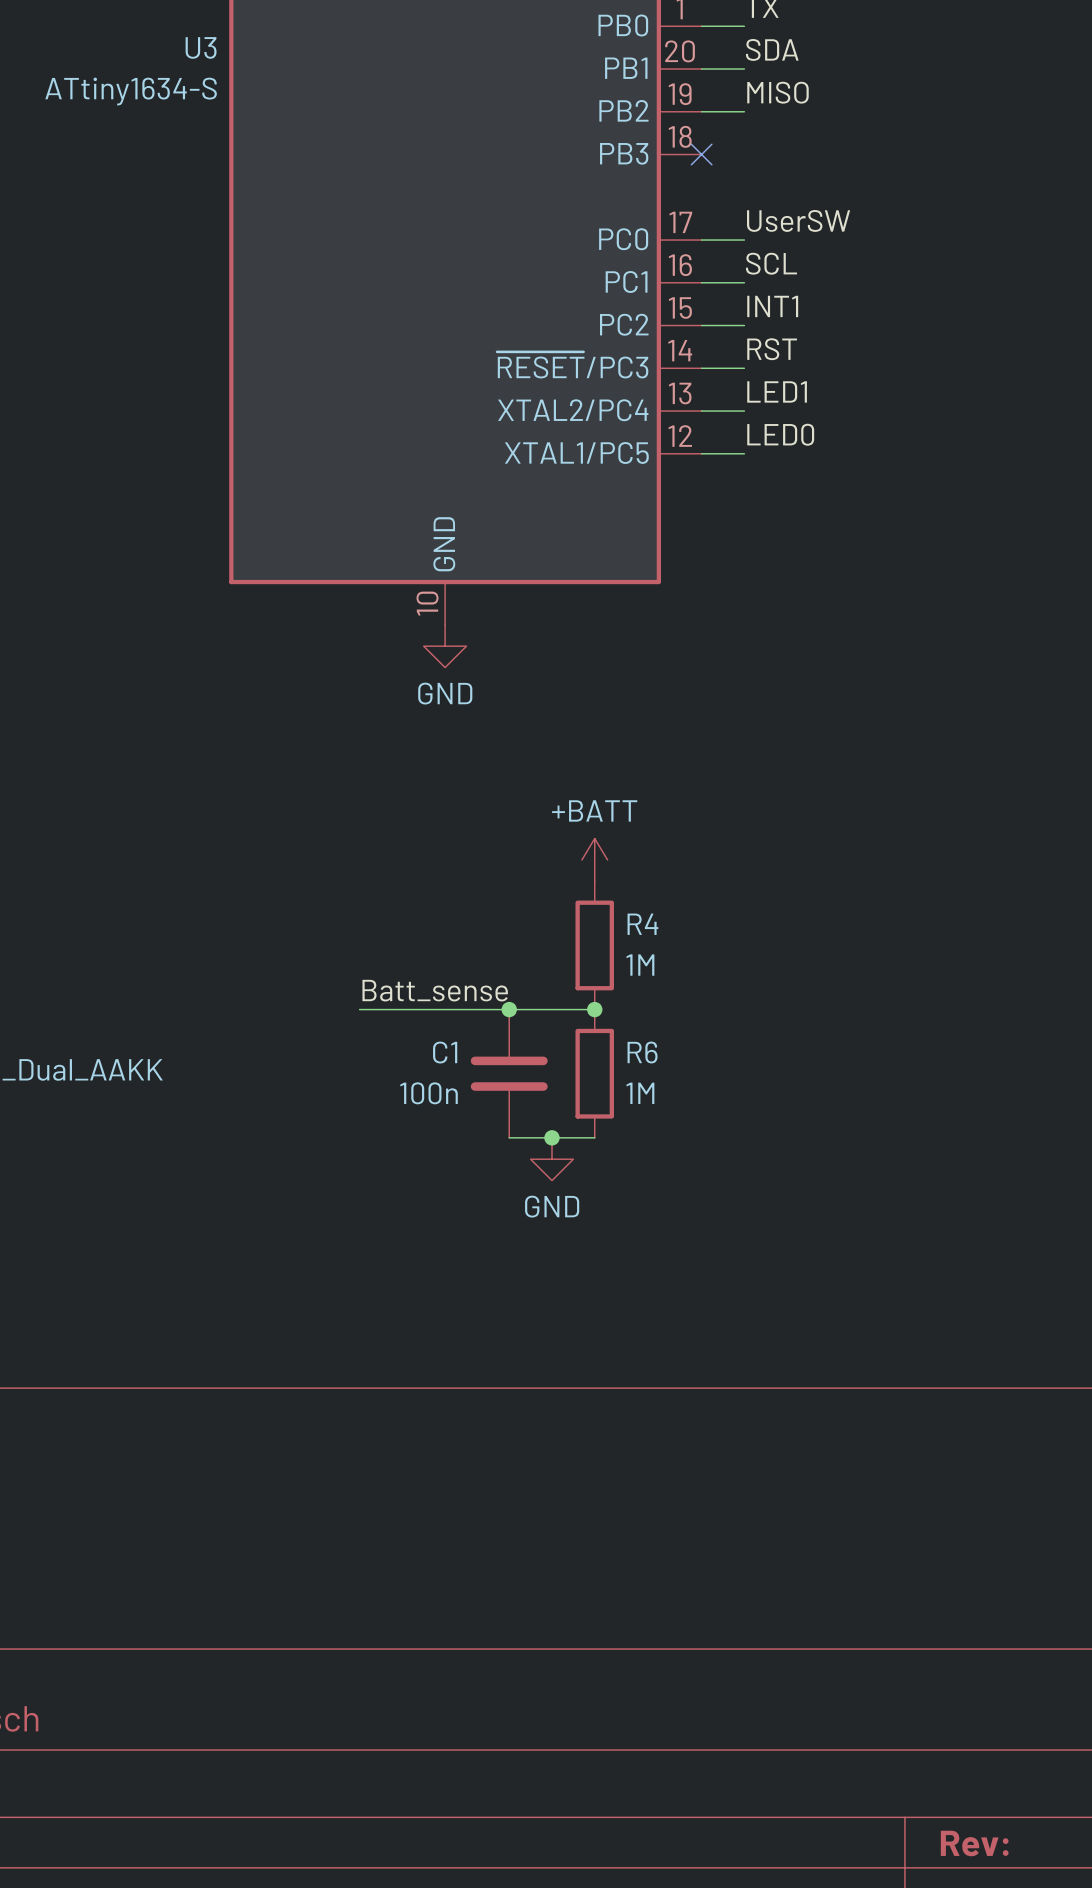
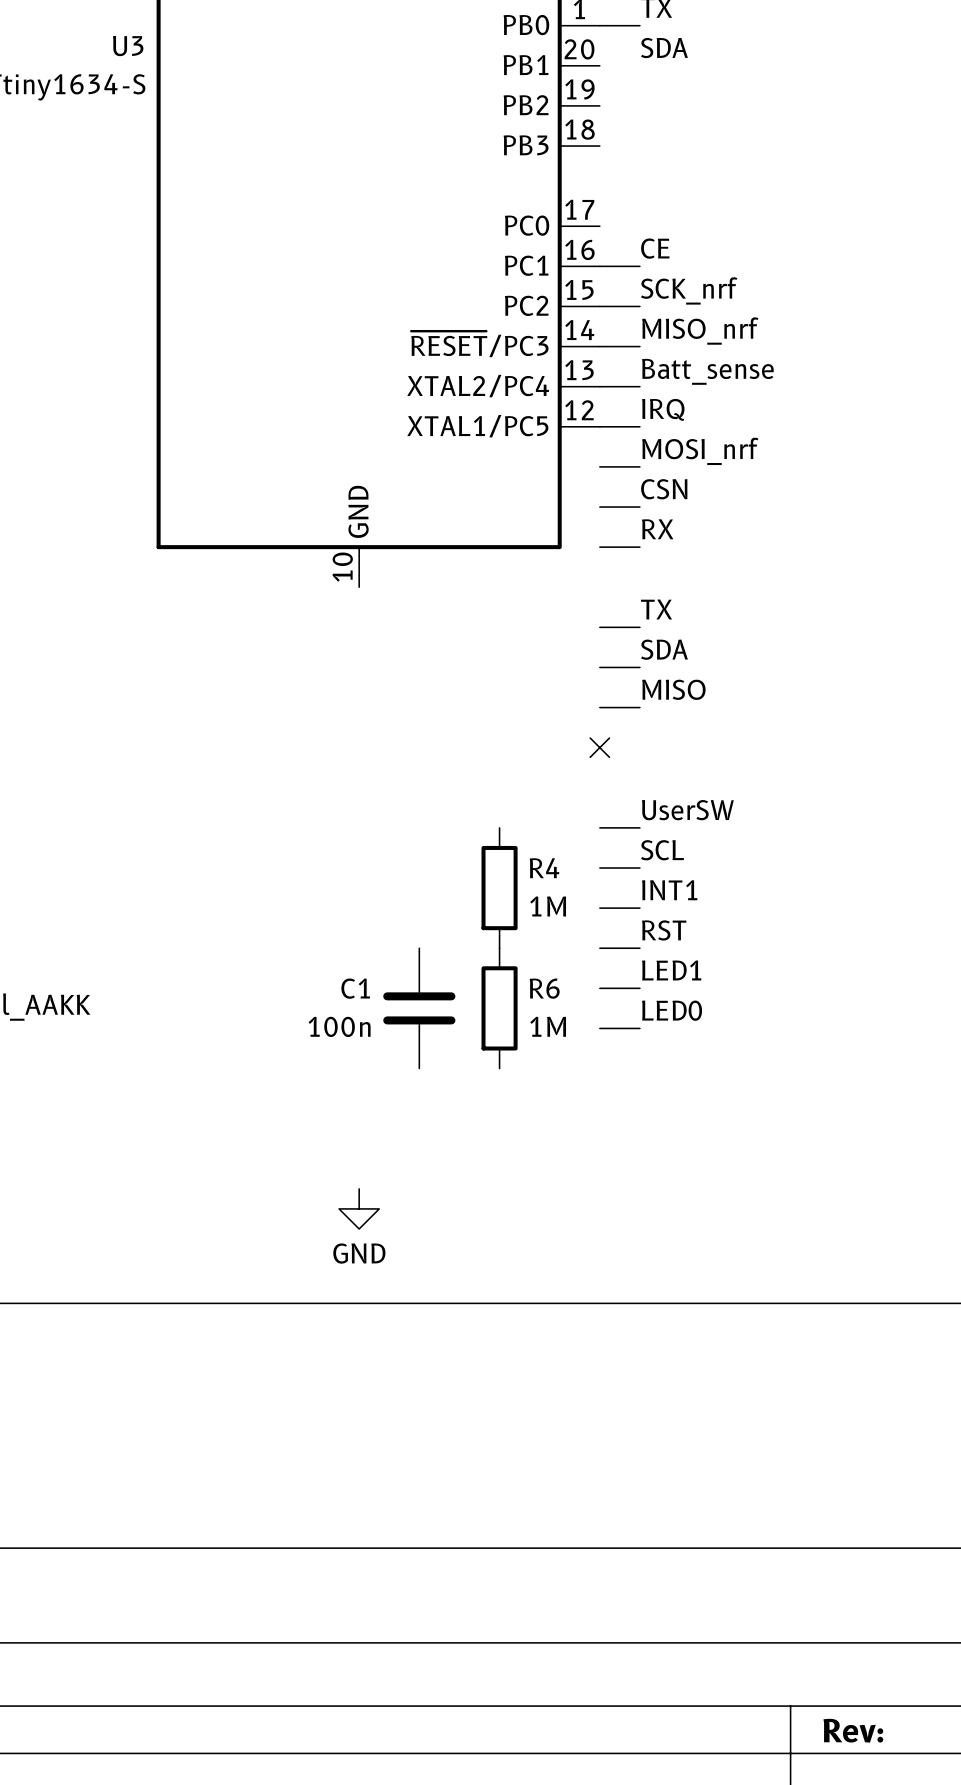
wire: (701, 69) (744, 69) -> none
label: MISO (777, 92) -> none
wire: (701, 111) (744, 111) -> none
no-connect mark: (701, 154) -> none
label: UserSW (798, 220) -> none
wire: (701, 240) (744, 240) -> (599, 466) (639, 466)
label: SCL (771, 263) -> CE (655, 248)
label: INT1 (772, 306) -> SCK_nrf (689, 290)
label: RST (772, 349) -> MISO_nrf (700, 331)
label: LED1 (777, 391) -> Batt_sense (707, 371)
label: LED0 (780, 434) -> IRQ (663, 409)
label: none -> MOSI_nrf (700, 451)
label: none -> CSN (664, 489)
wire: none -> (599, 507) (639, 507)
label: none -> RX (657, 529)
wire: none -> (599, 547) (639, 547)
power symbol: GND (445, 646) -> none
label: none -> TX (656, 609)
wire: none -> (599, 627) (639, 627)
label: none -> SDA (664, 649)
wire: none -> (599, 667) (639, 667)
label: none -> MISO (673, 689)
wire: none -> (599, 707) (639, 707)
no-connect mark: none -> (599, 747)
power symbol: +BATT (594, 859) -> none
label: none -> UserSW (687, 810)
wire: none -> (599, 827) (639, 827)
label: none -> SCL (662, 850)
wire: none -> (599, 868) (639, 868)
label: none -> INT1 (669, 890)
wire: none -> (599, 908) (639, 908)
label: Batt_sense (435, 990) -> none
label: none -> RST (664, 930)
wire: (359, 1009) (594, 1009) -> none
junction: (509, 1009) -> none
junction: (594, 1009) -> none
wire: none -> (599, 948) (639, 948)
label: none -> LED1 (671, 970)
wire: none -> (599, 988) (639, 988)
label: none -> LED0 (672, 1010)
wire: none -> (599, 1028) (639, 1028)
wire: (509, 1137) (594, 1137) -> none
junction: (551, 1137) -> none
power symbol position: GND (551, 1159) -> GND (359, 1208)

